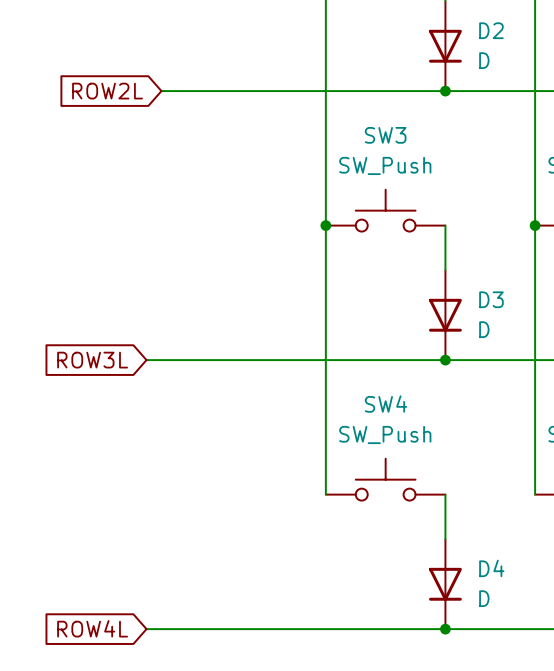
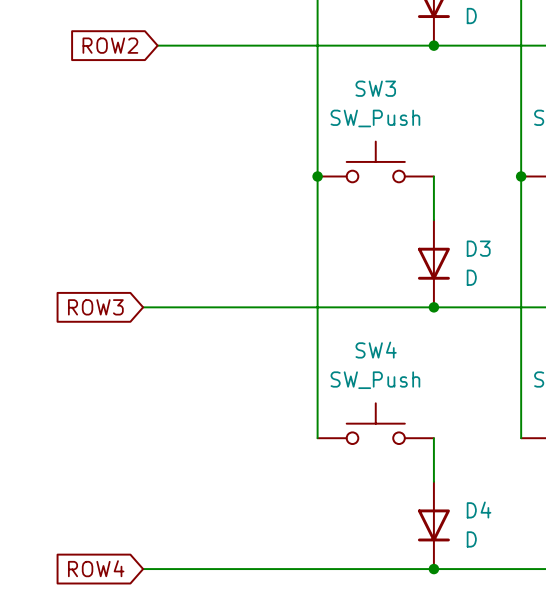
global label: ROW2L (107, 91) -> ROW2 (110, 45)
global label: ROW3L (92, 360) -> ROW3 (95, 307)
global label: ROW4L (92, 628) -> ROW4 (96, 568)

